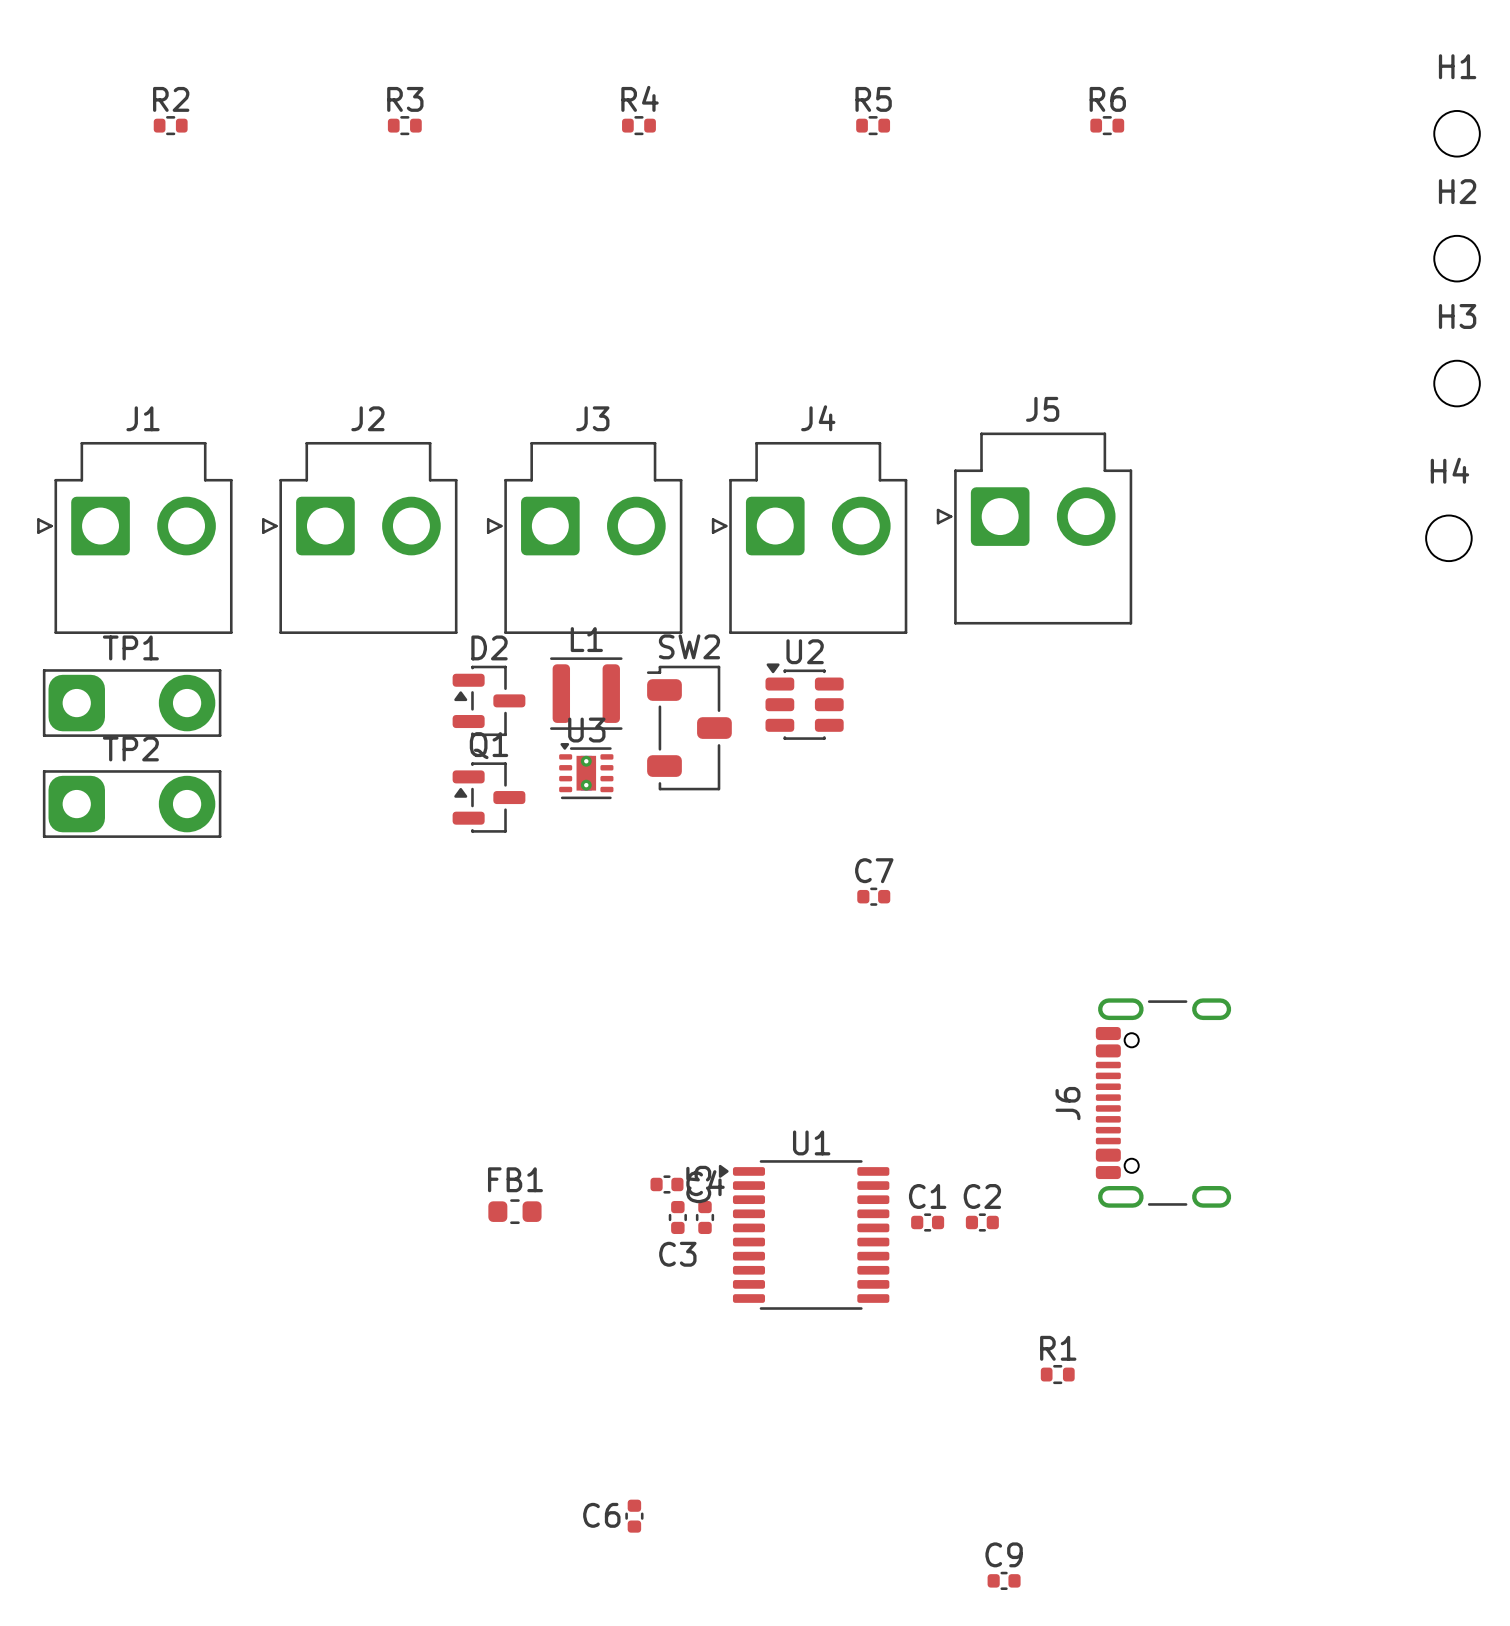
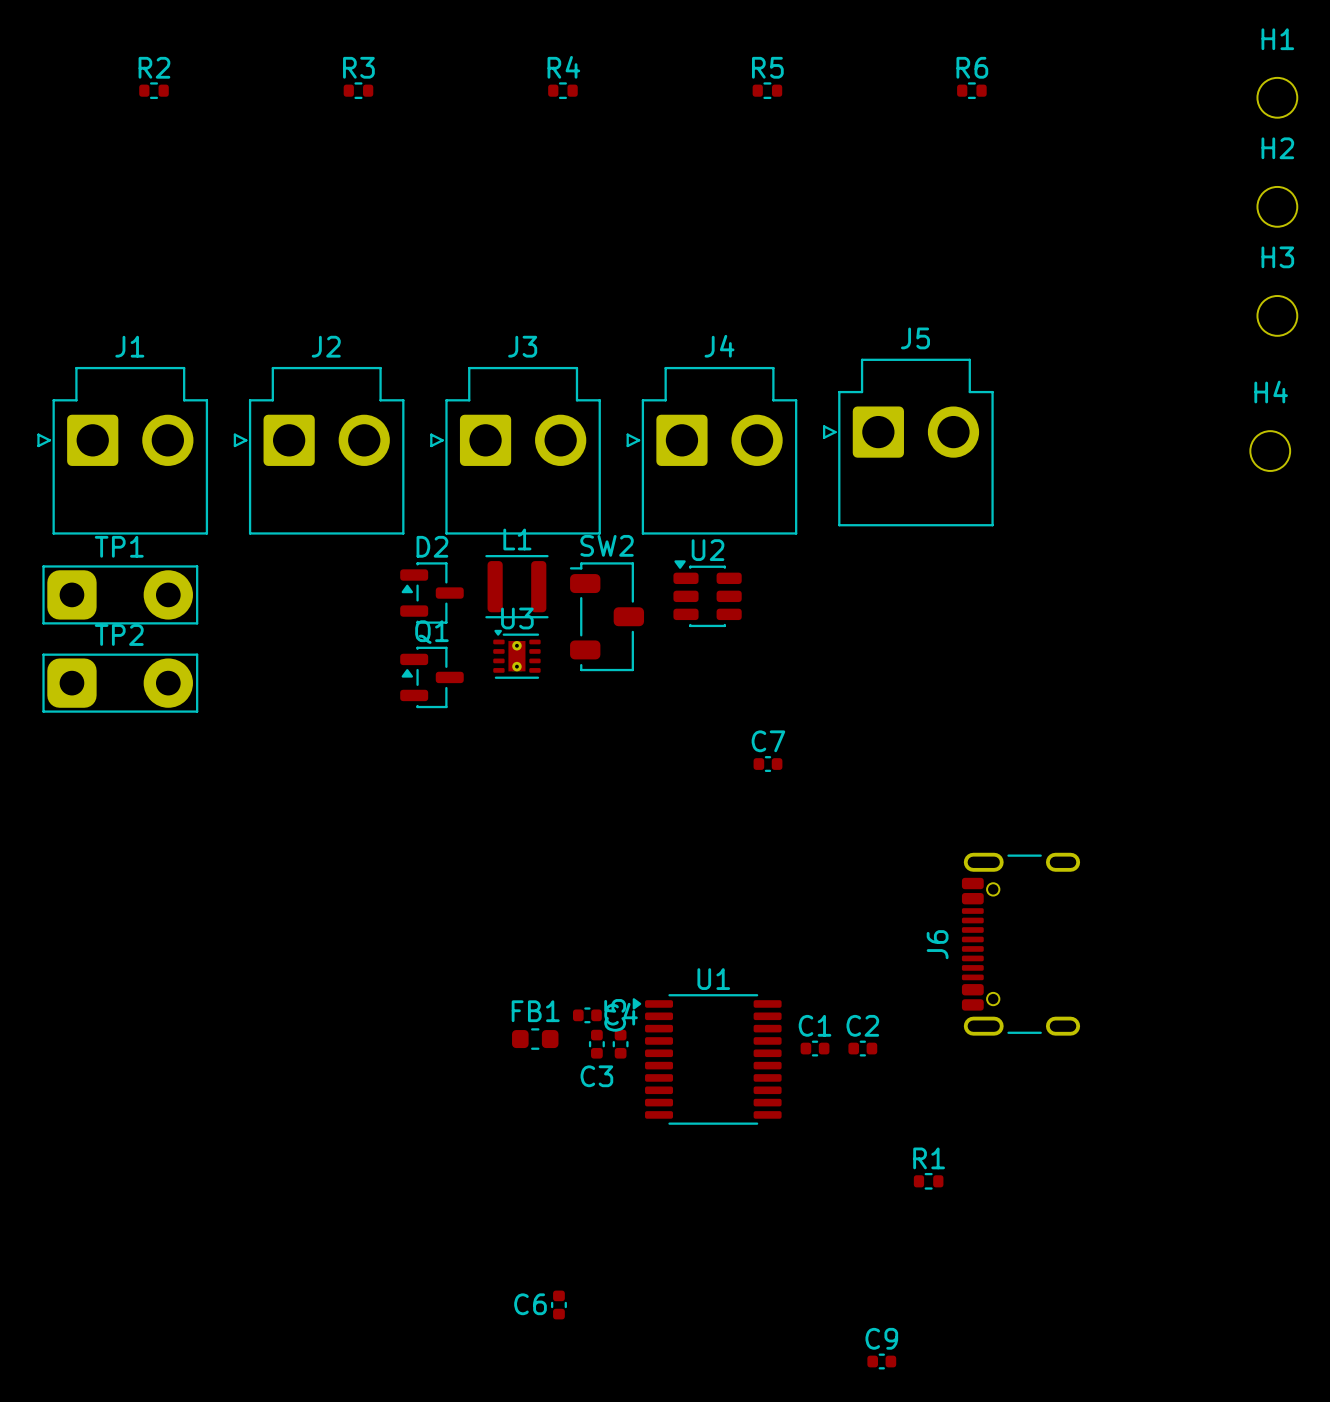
FB1 position: (514, 1211) -> (535, 1039)

